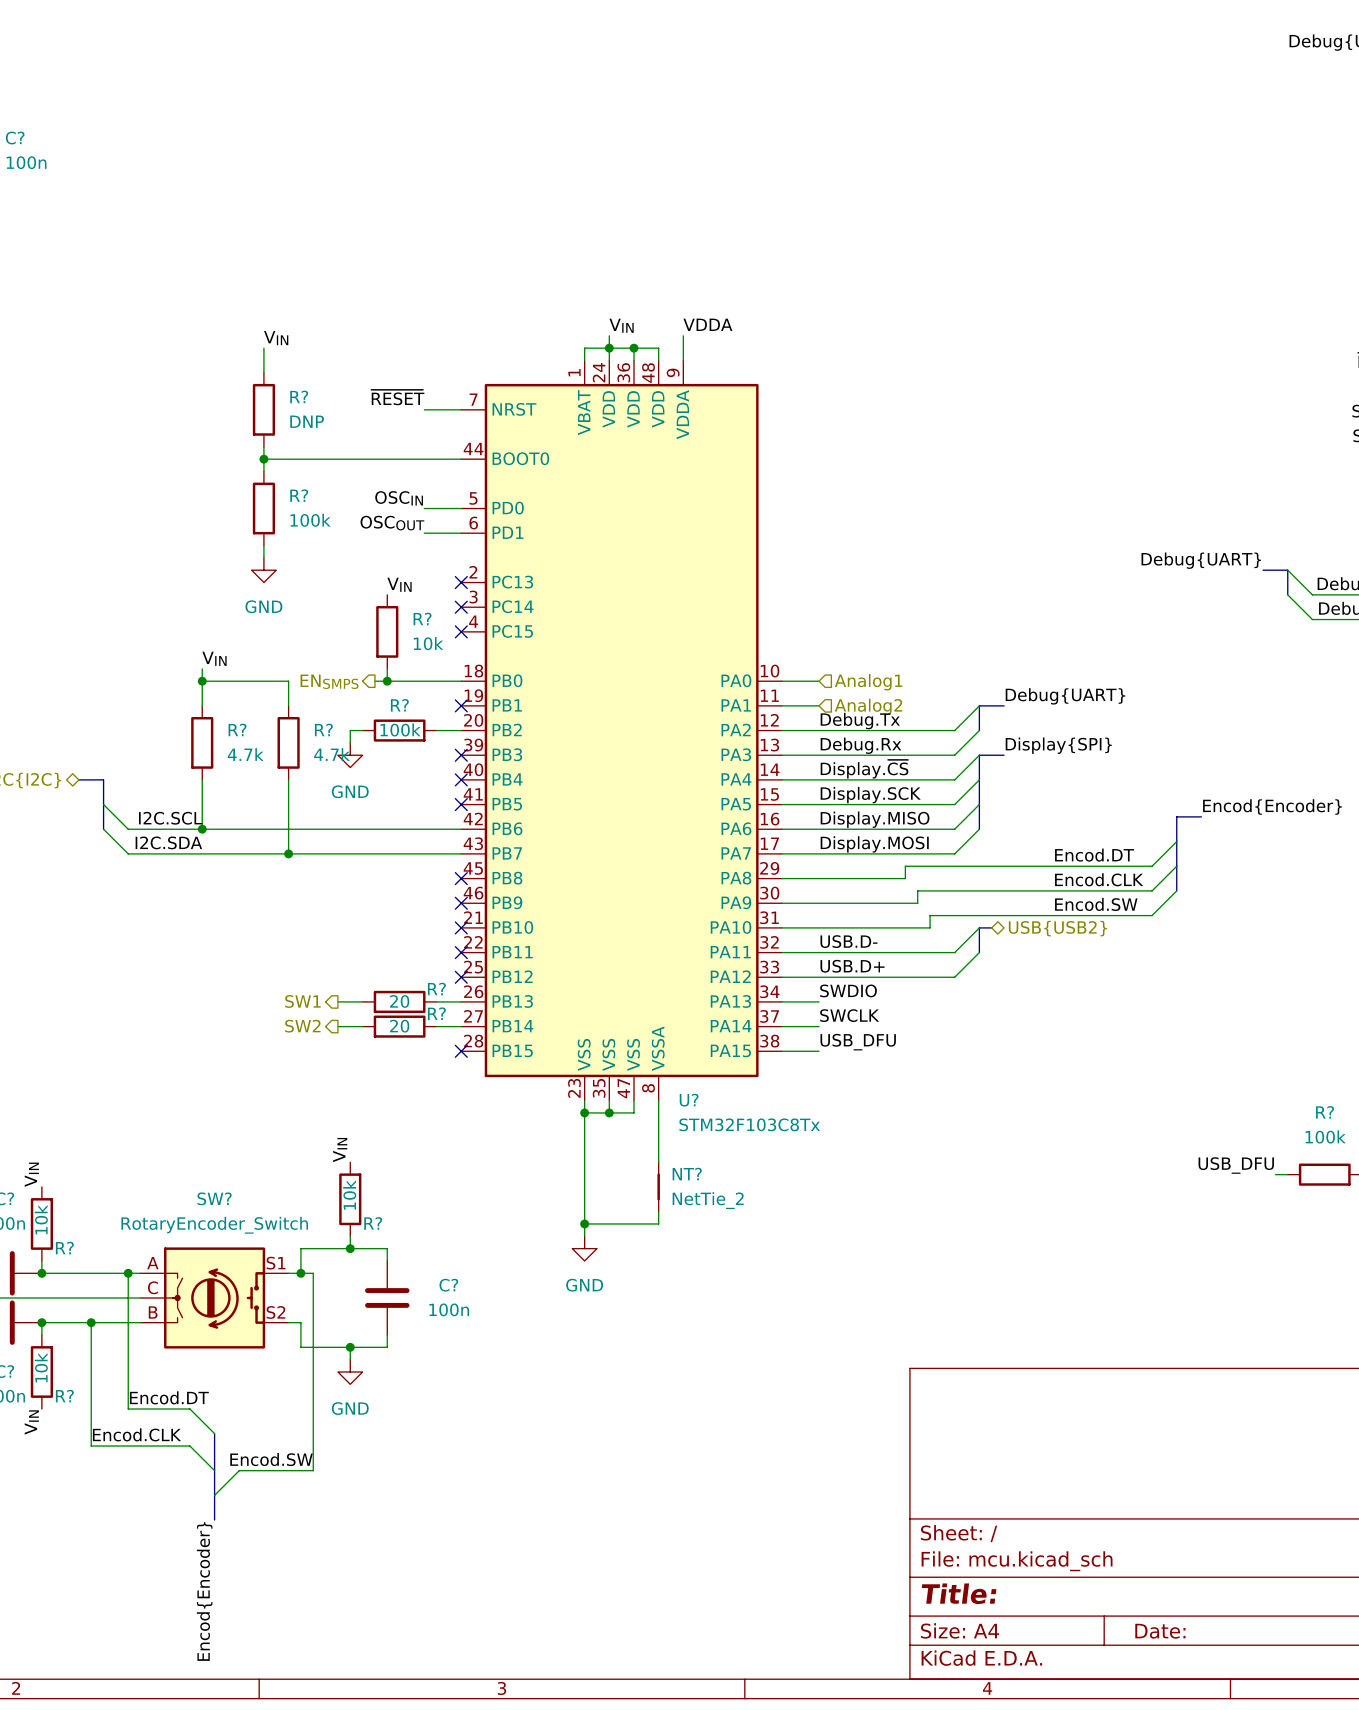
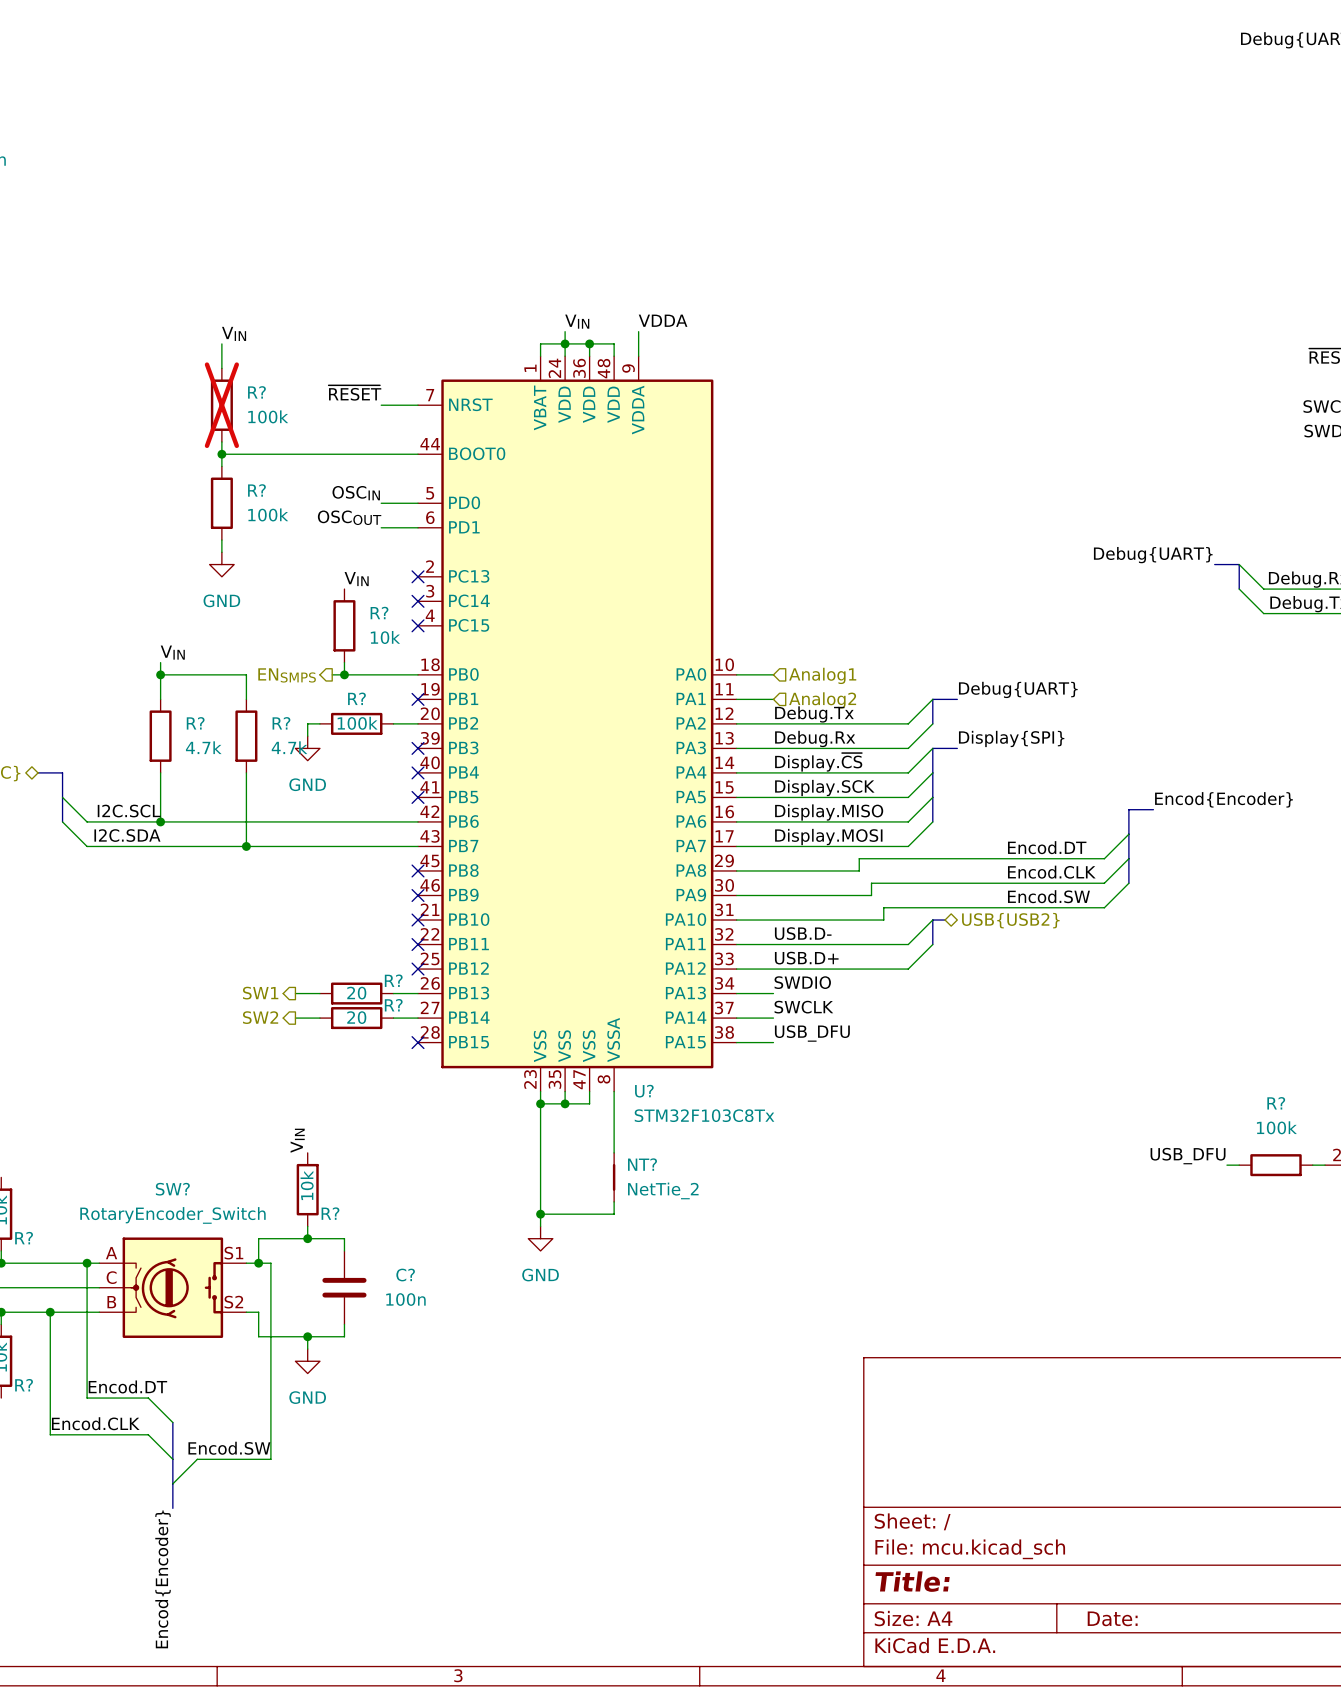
R? do-not-place cross: none -> (221, 405)
R? value: DNP (307, 421) -> 100k (268, 416)
SW? symbol: [140, 1247, 289, 1349] -> [99, 1237, 247, 1338]

